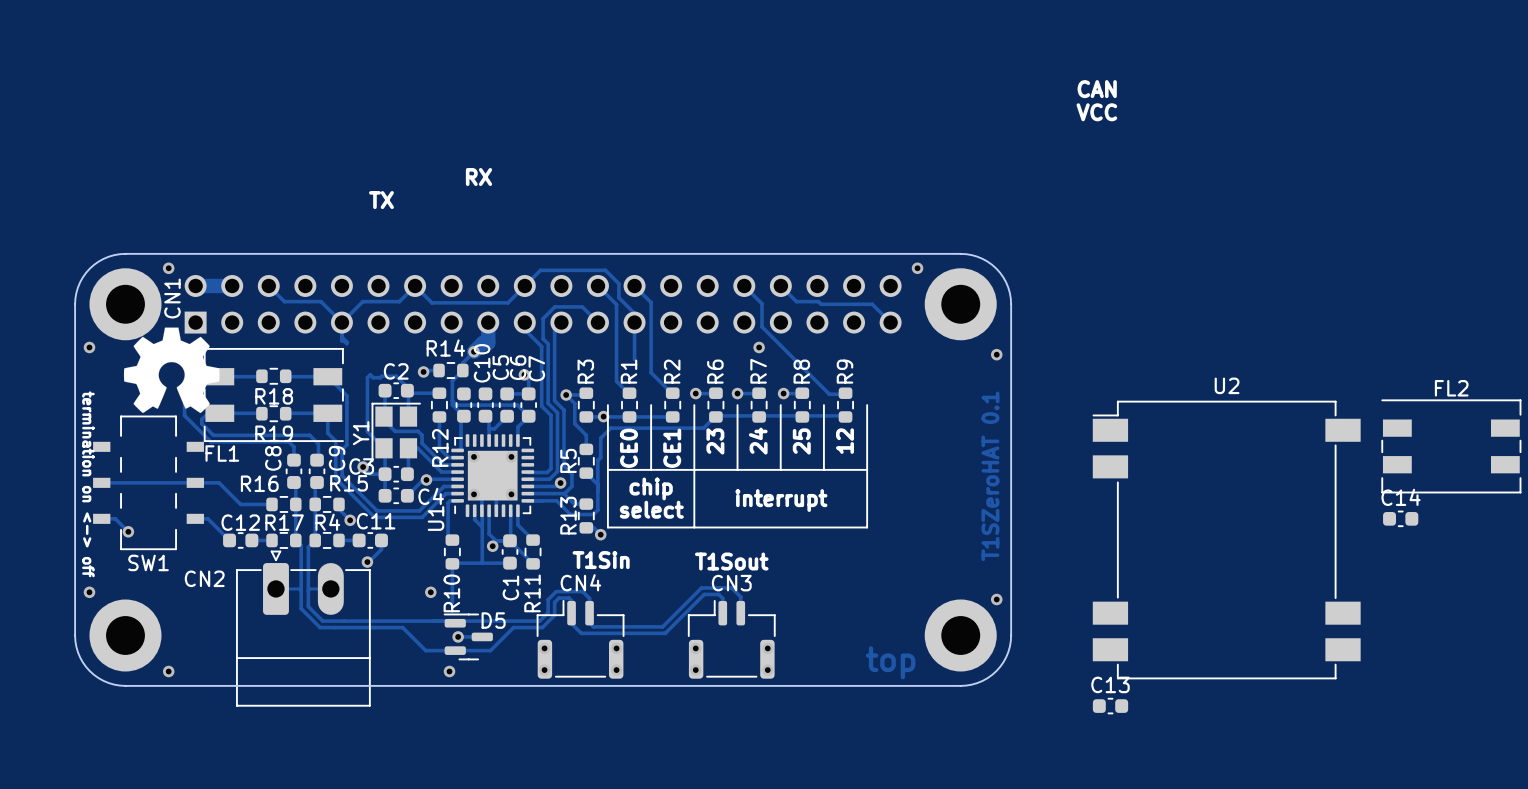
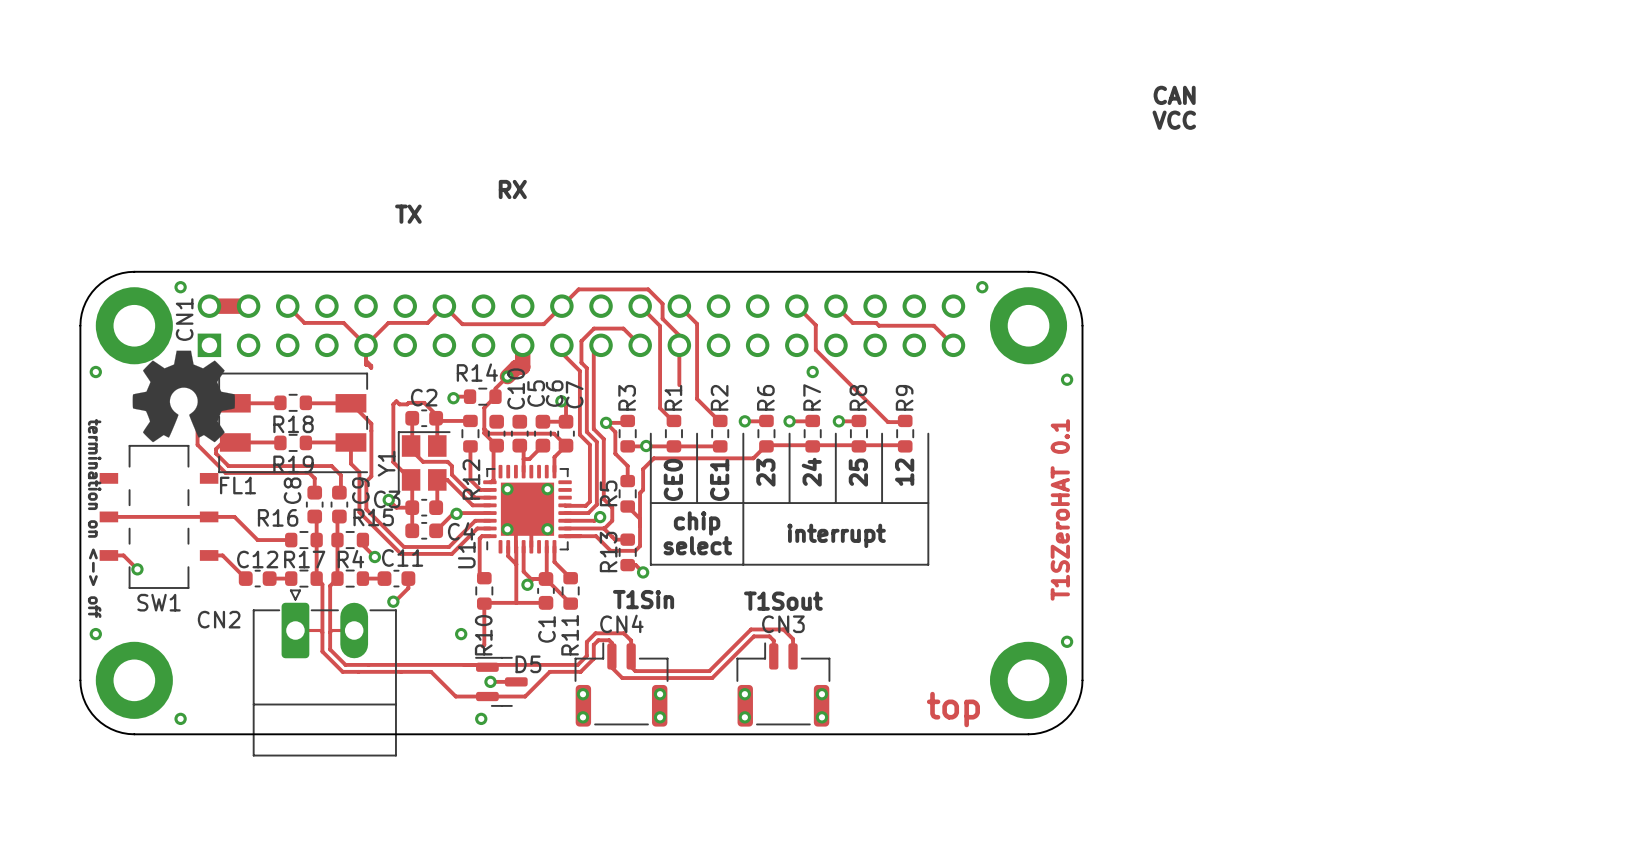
FL2: (1451, 446) -> none
C14: (1400, 518) -> none
U2: (1226, 540) -> none
C13: (1110, 706) -> none

